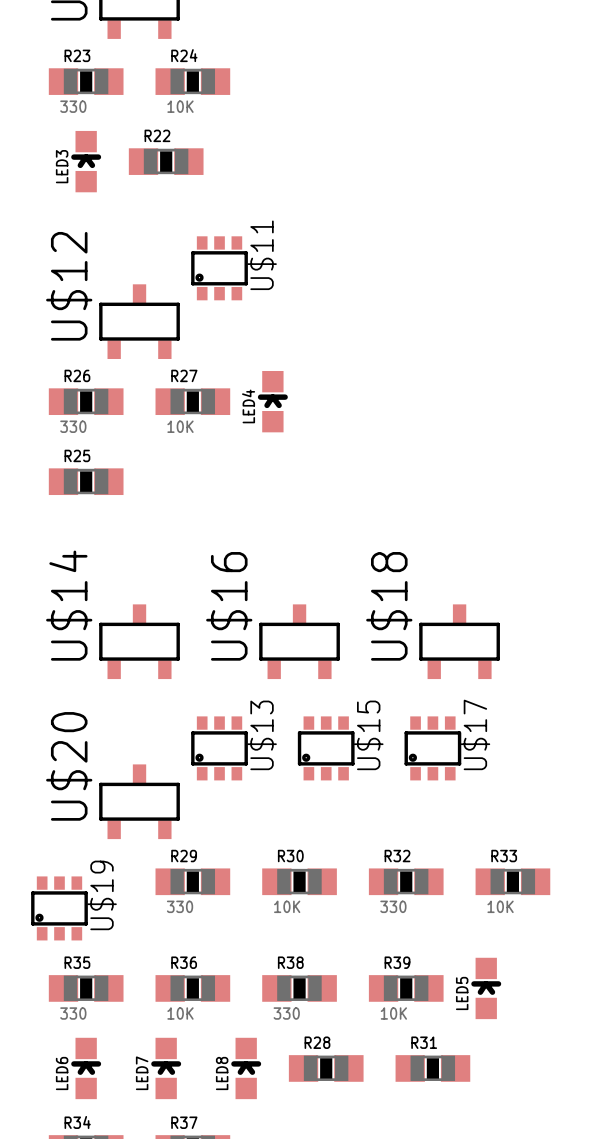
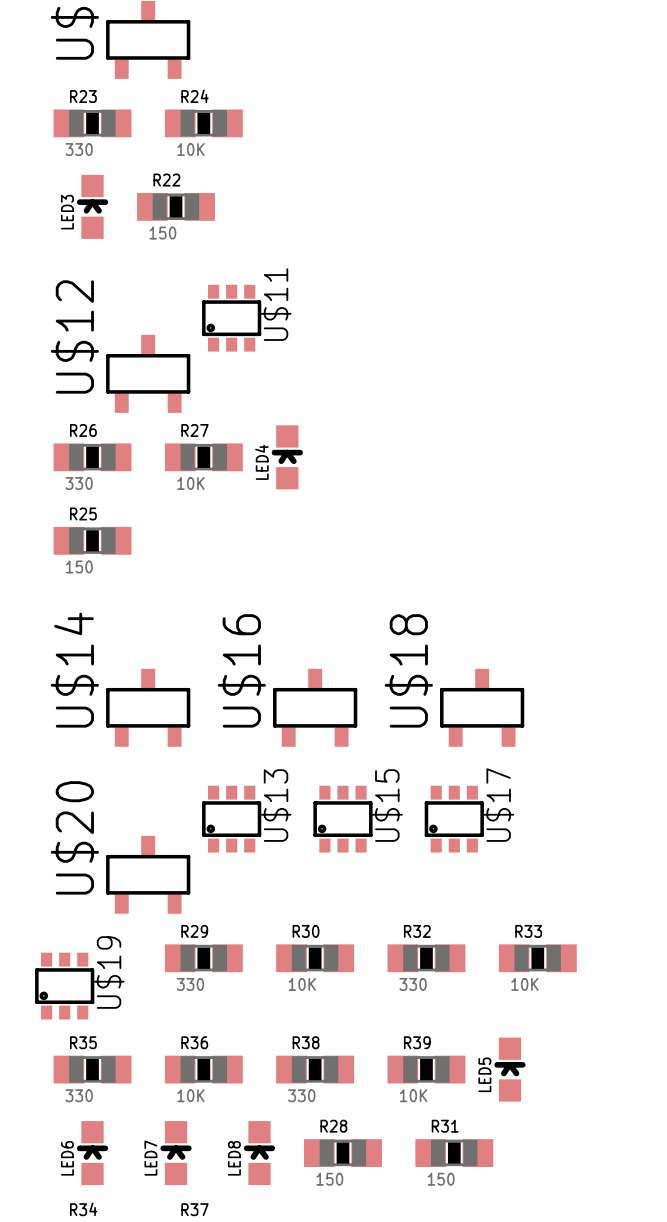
R22 value: none -> 150 (162, 233)
R25 value: none -> 150 (79, 566)
R28 value: none -> 150 (329, 1179)
R31 value: none -> 150 (441, 1179)

